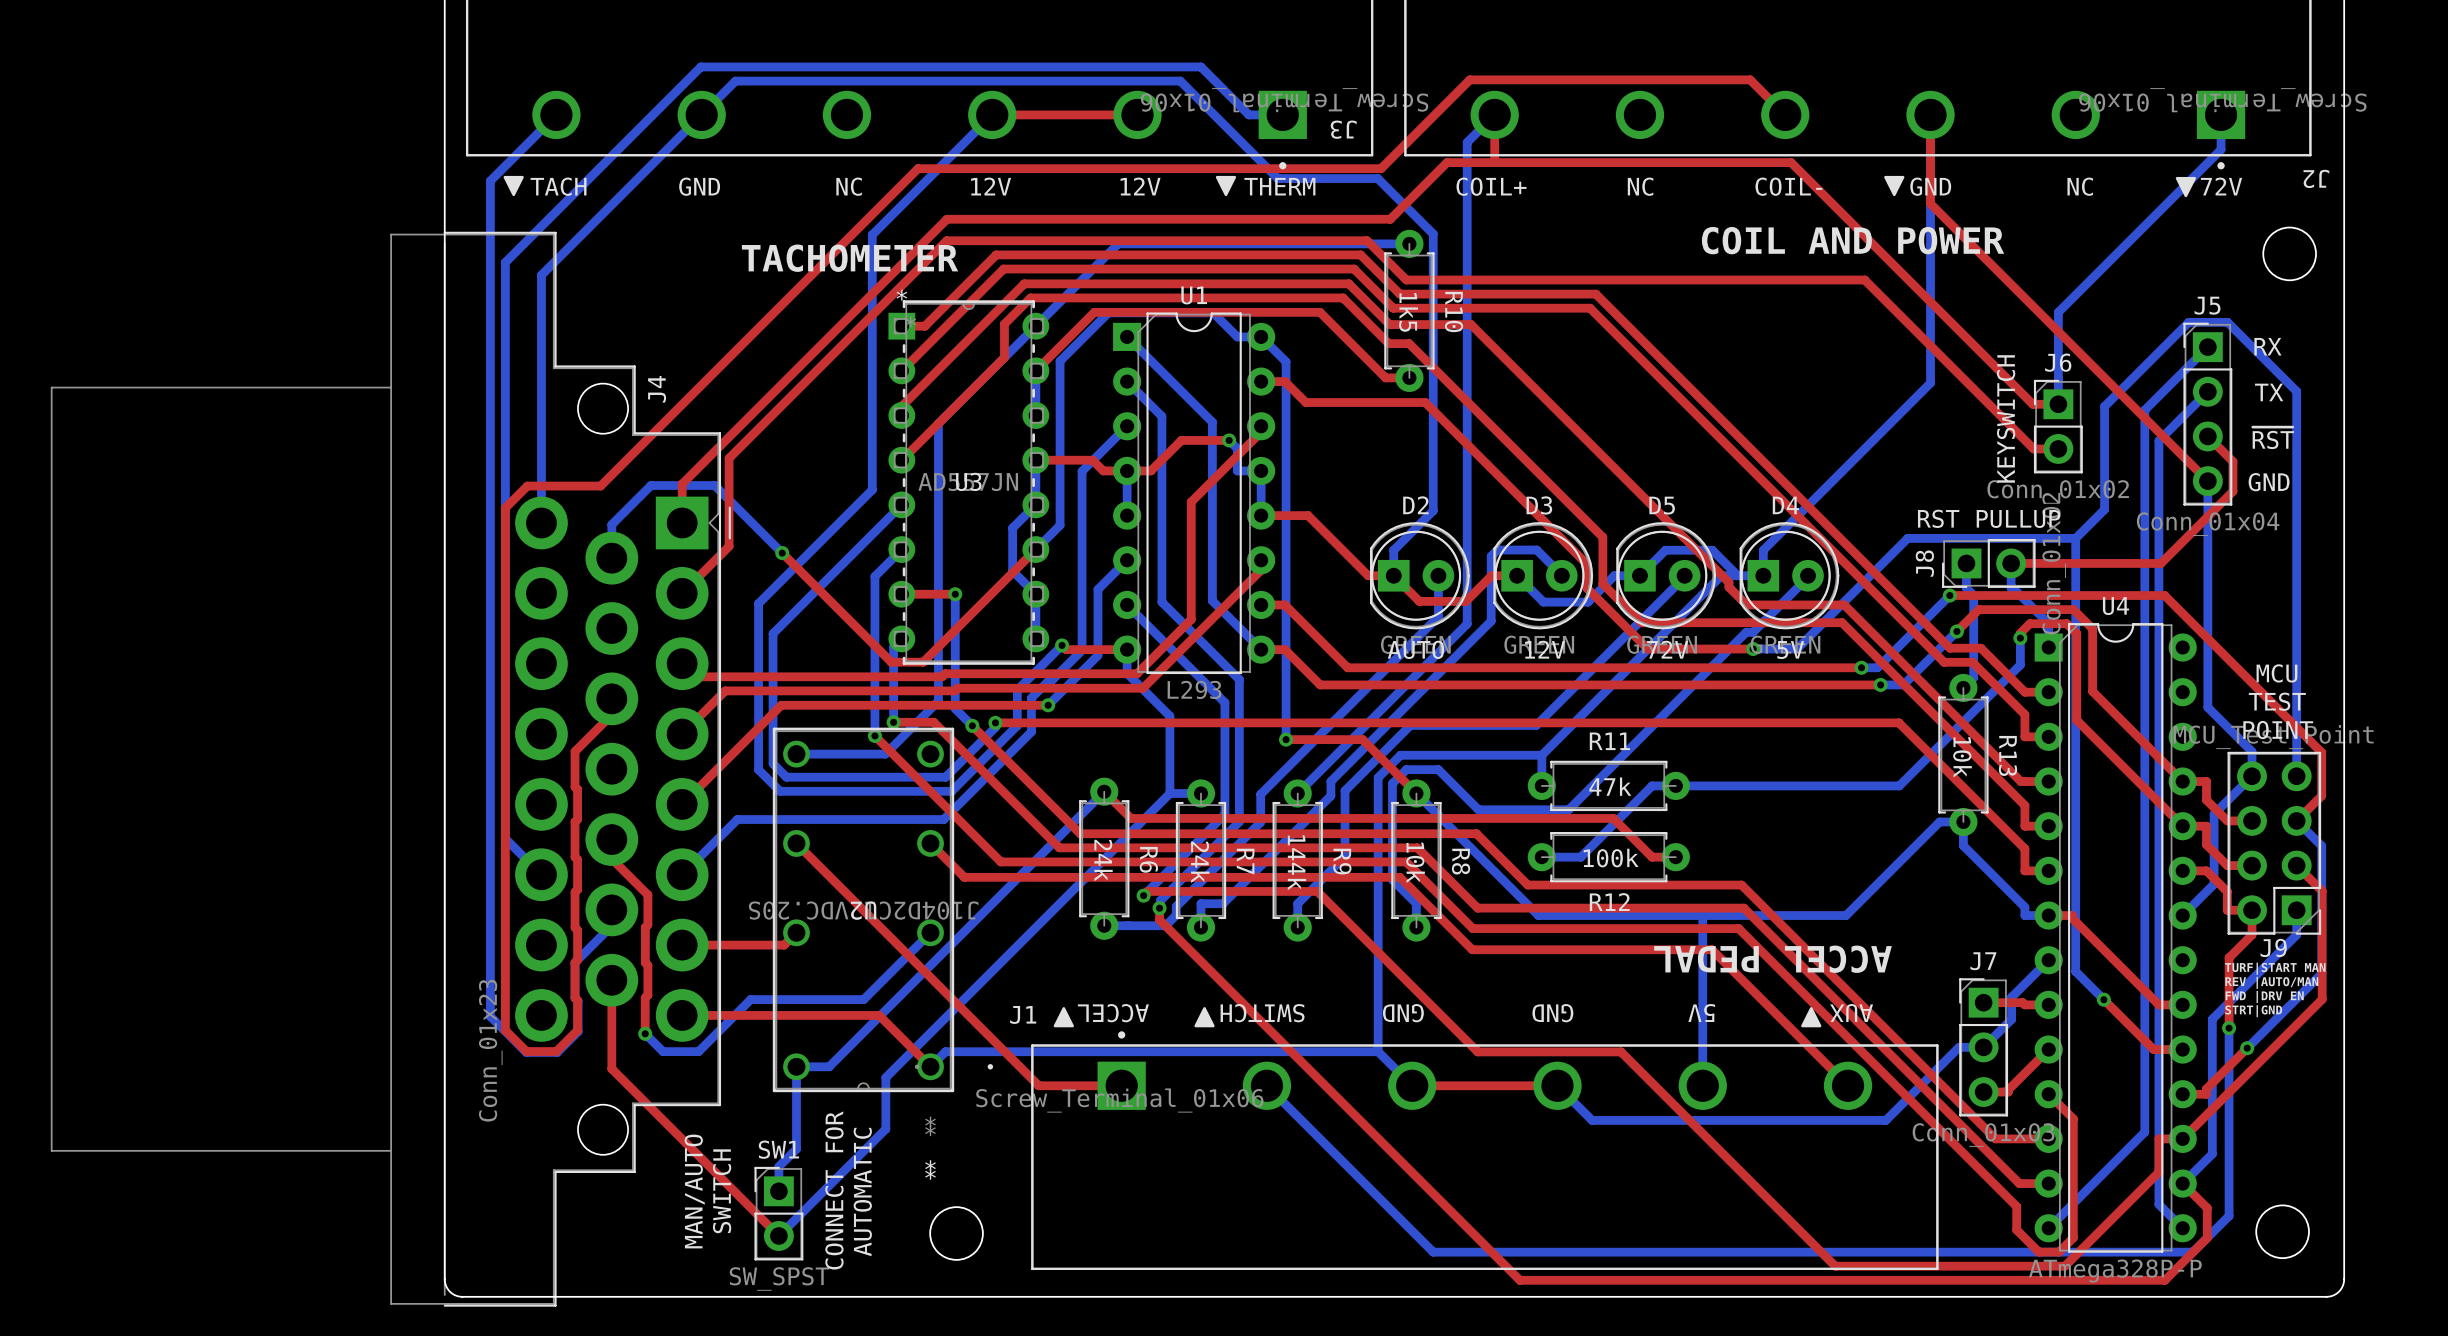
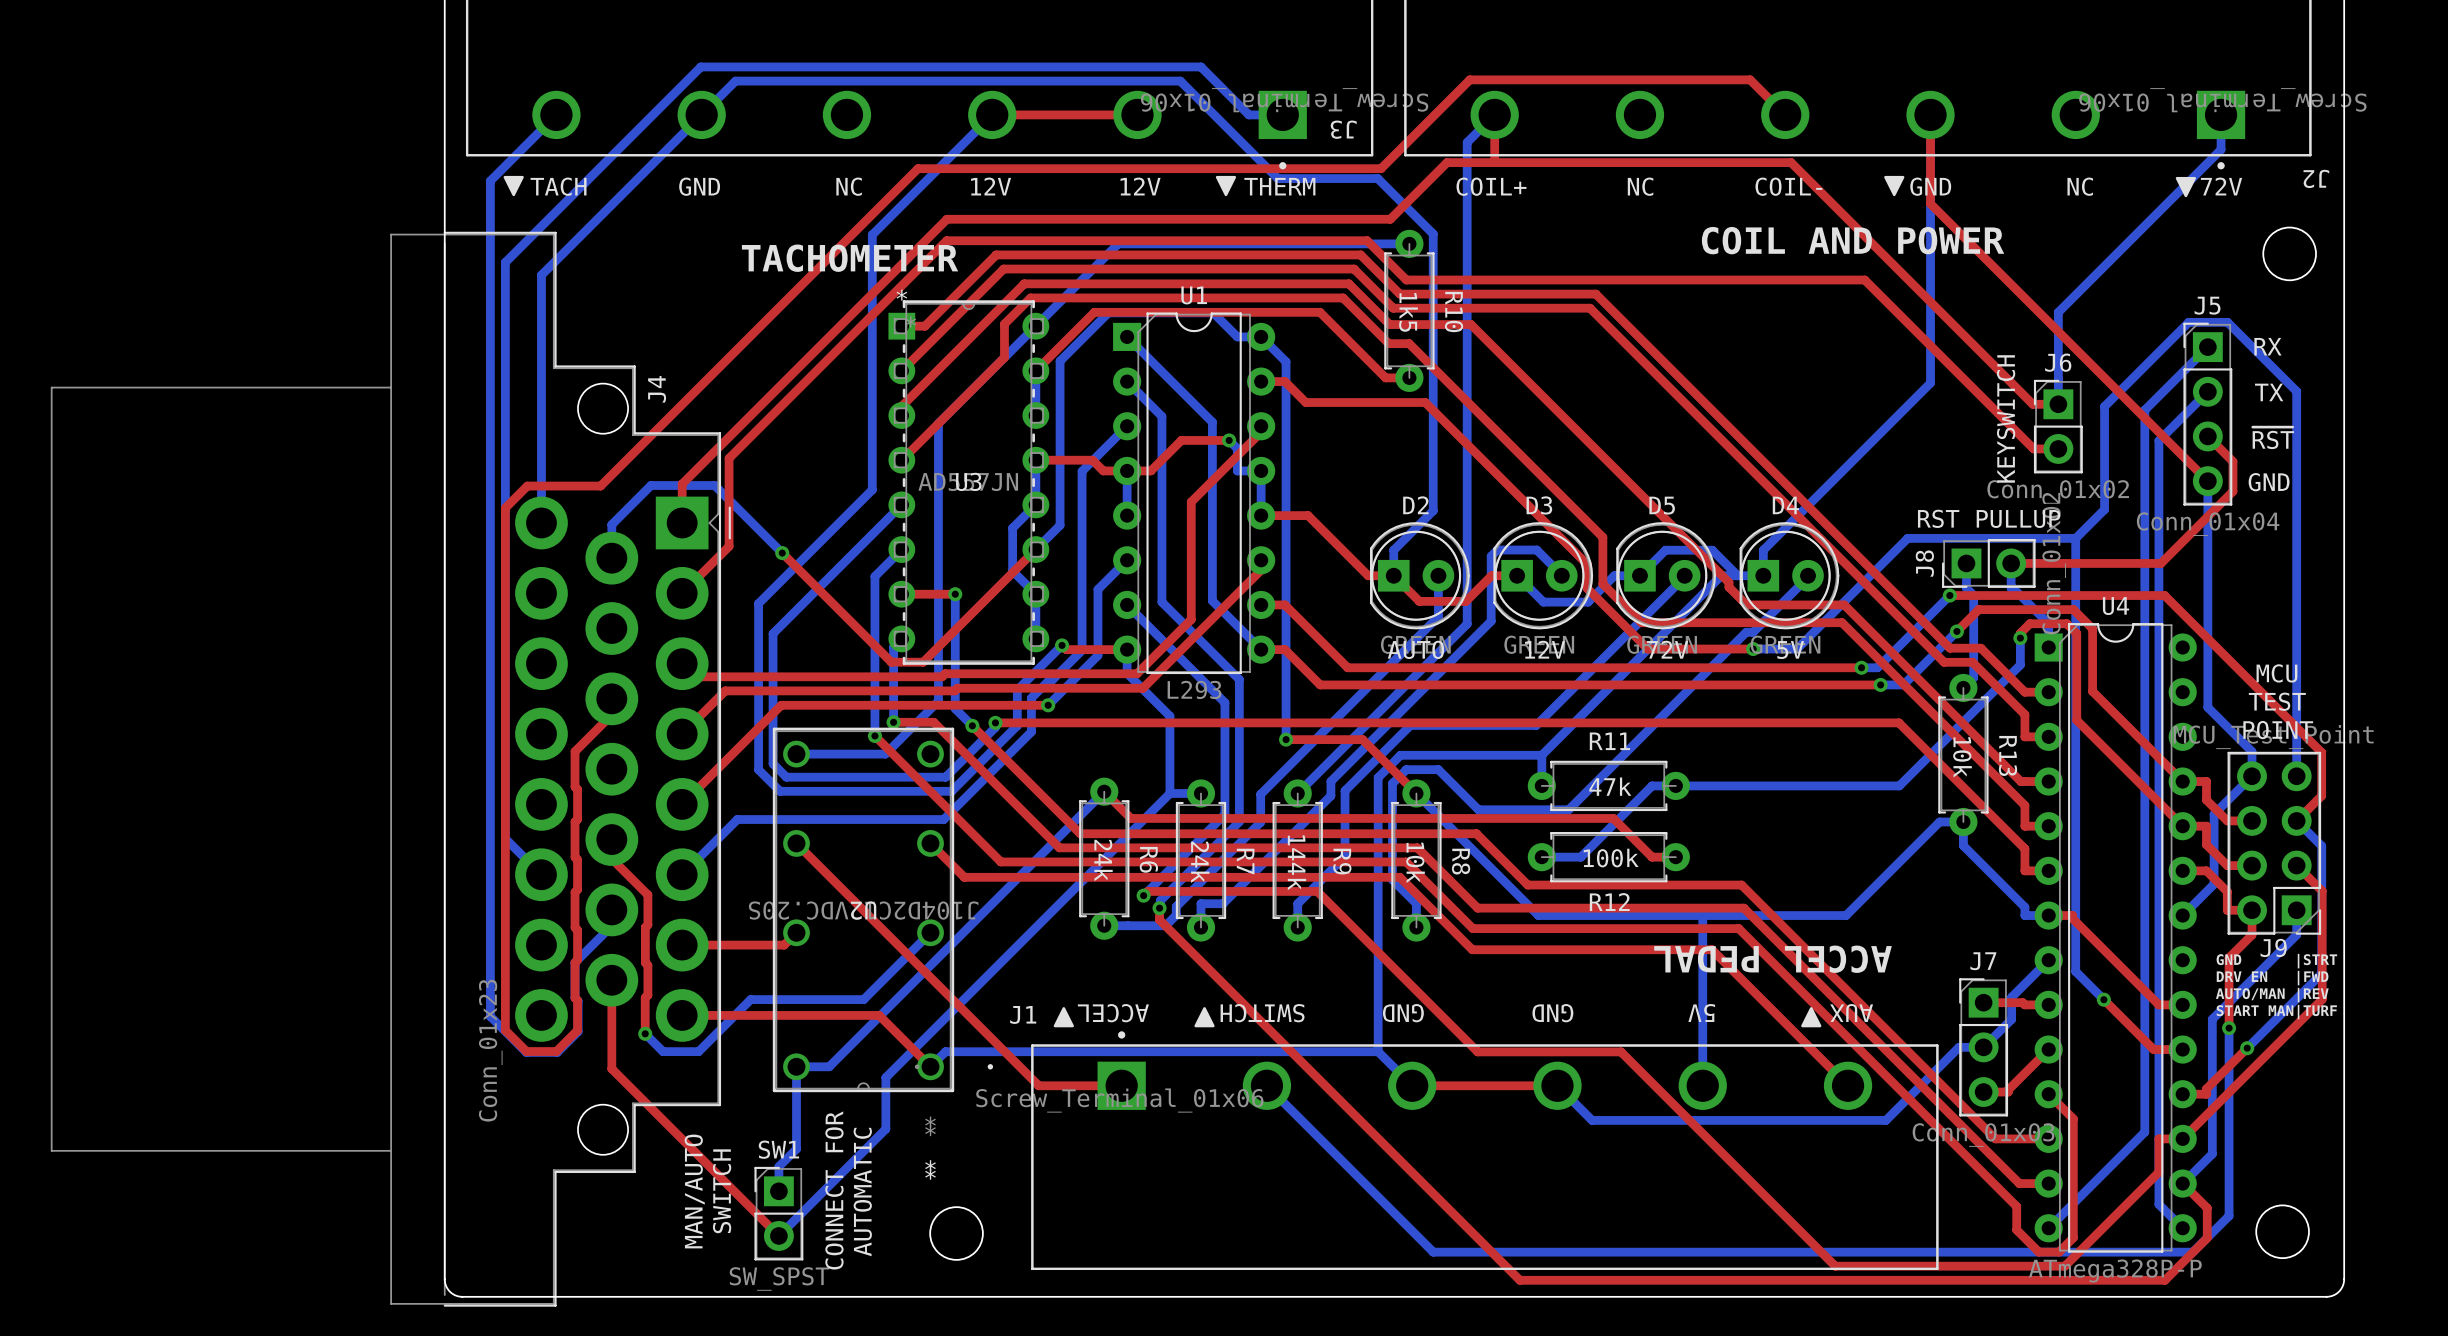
text: none -> GND |STRT (2276, 961)
text: TURF|START MAN (2275, 968) -> none
text: none -> DRV EN |FWD (2272, 978)
text: REV |AUTO/MAN (2271, 982) -> AUTO/MAN |REV (2272, 995)
text: FWD |DRV EN (2264, 997) -> none
text: STRT|GND (2253, 1011) -> none
text: none -> START MAN|TURF (2276, 1012)

